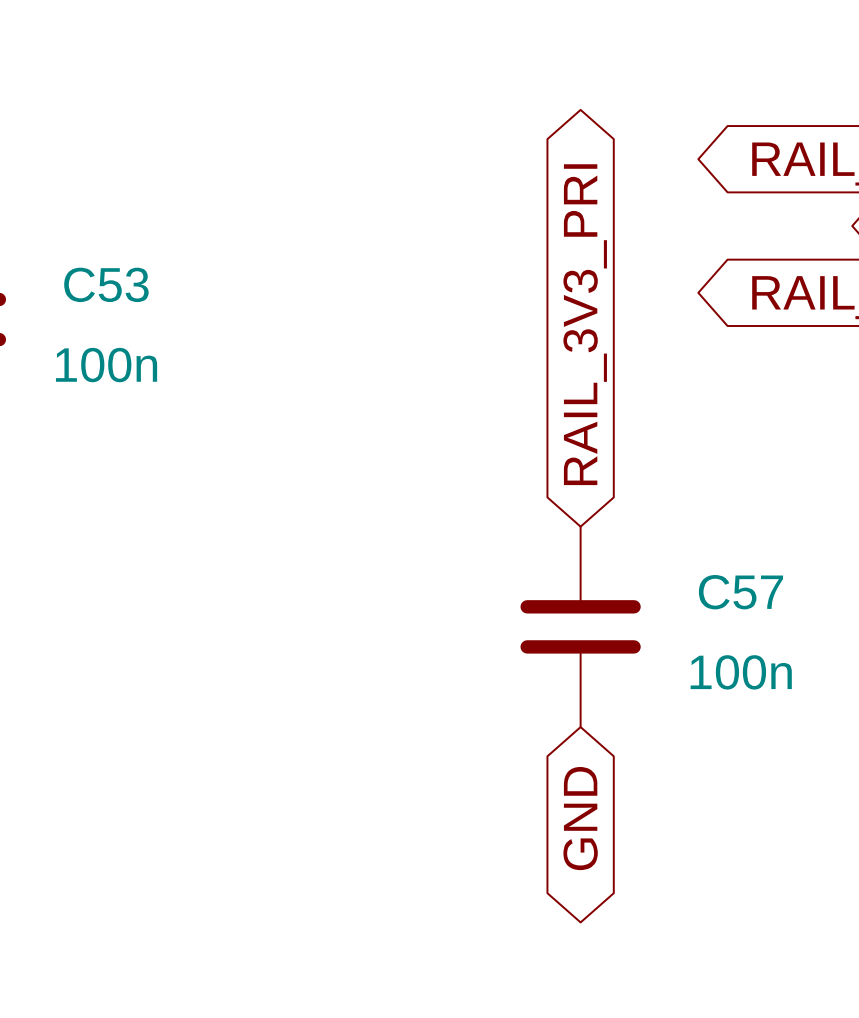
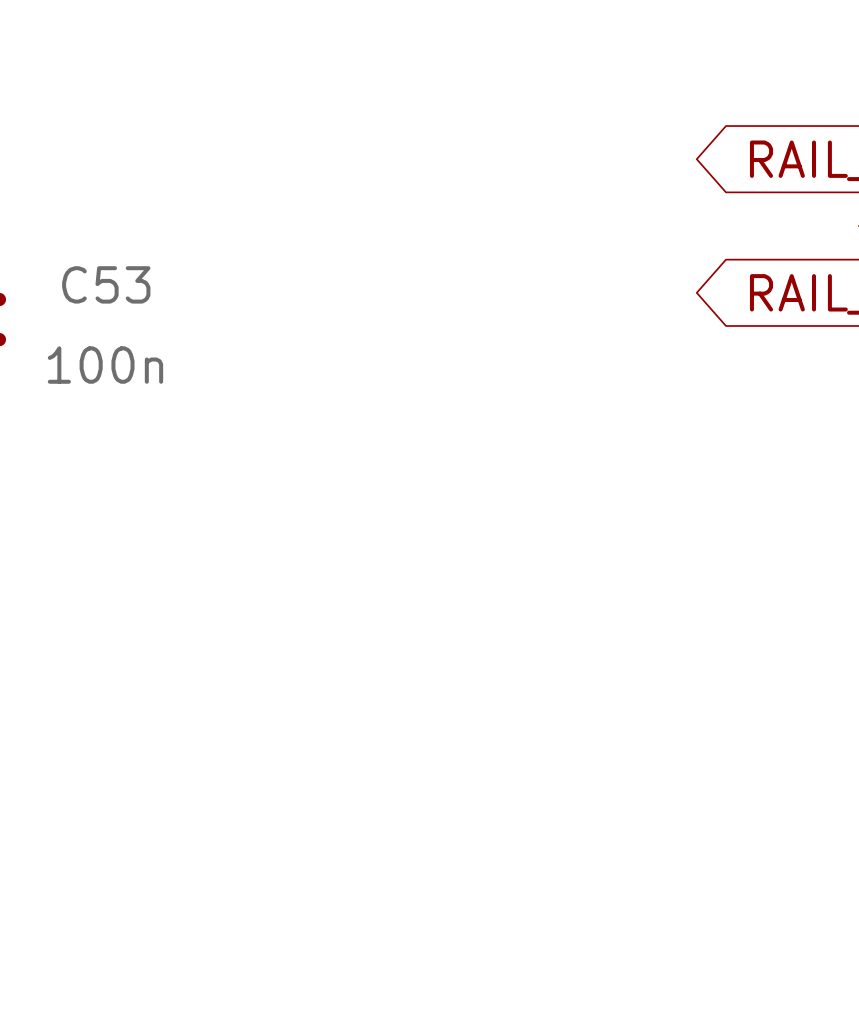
global label: RAIL_3V3_PRI (585, 324) -> none
C57: 100n (580, 626) -> none
global label: GND (580, 818) -> none

